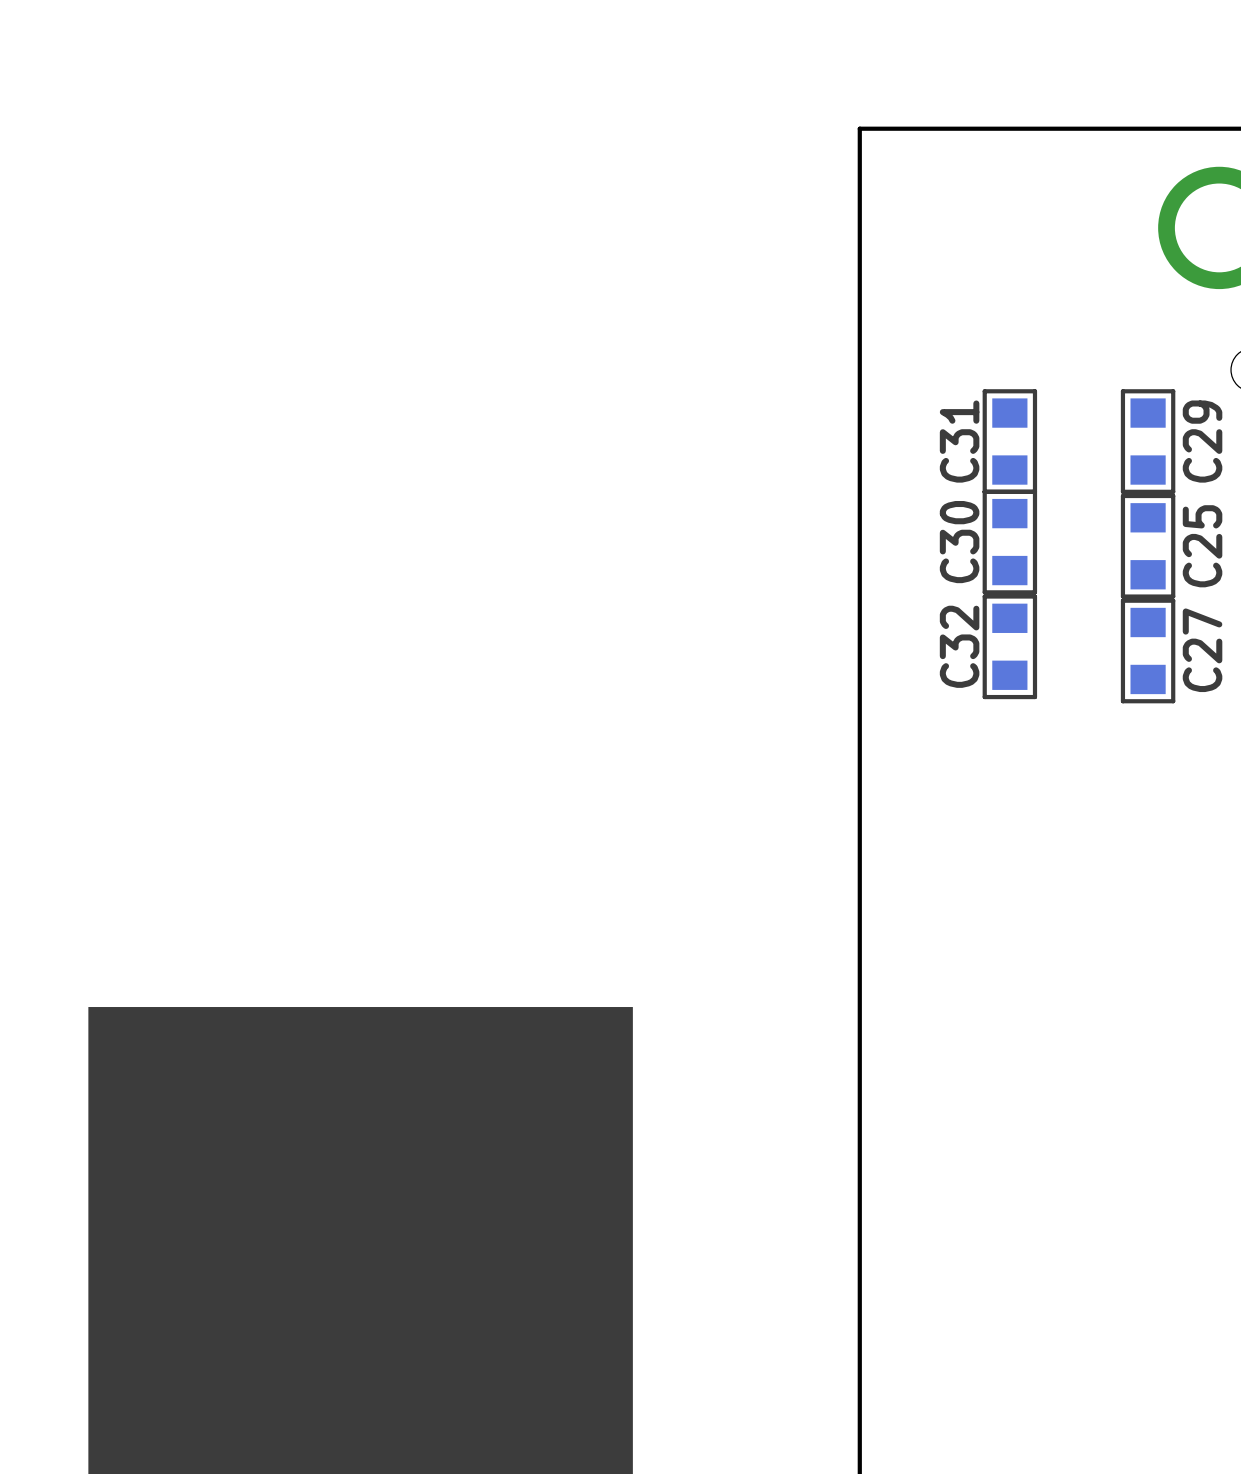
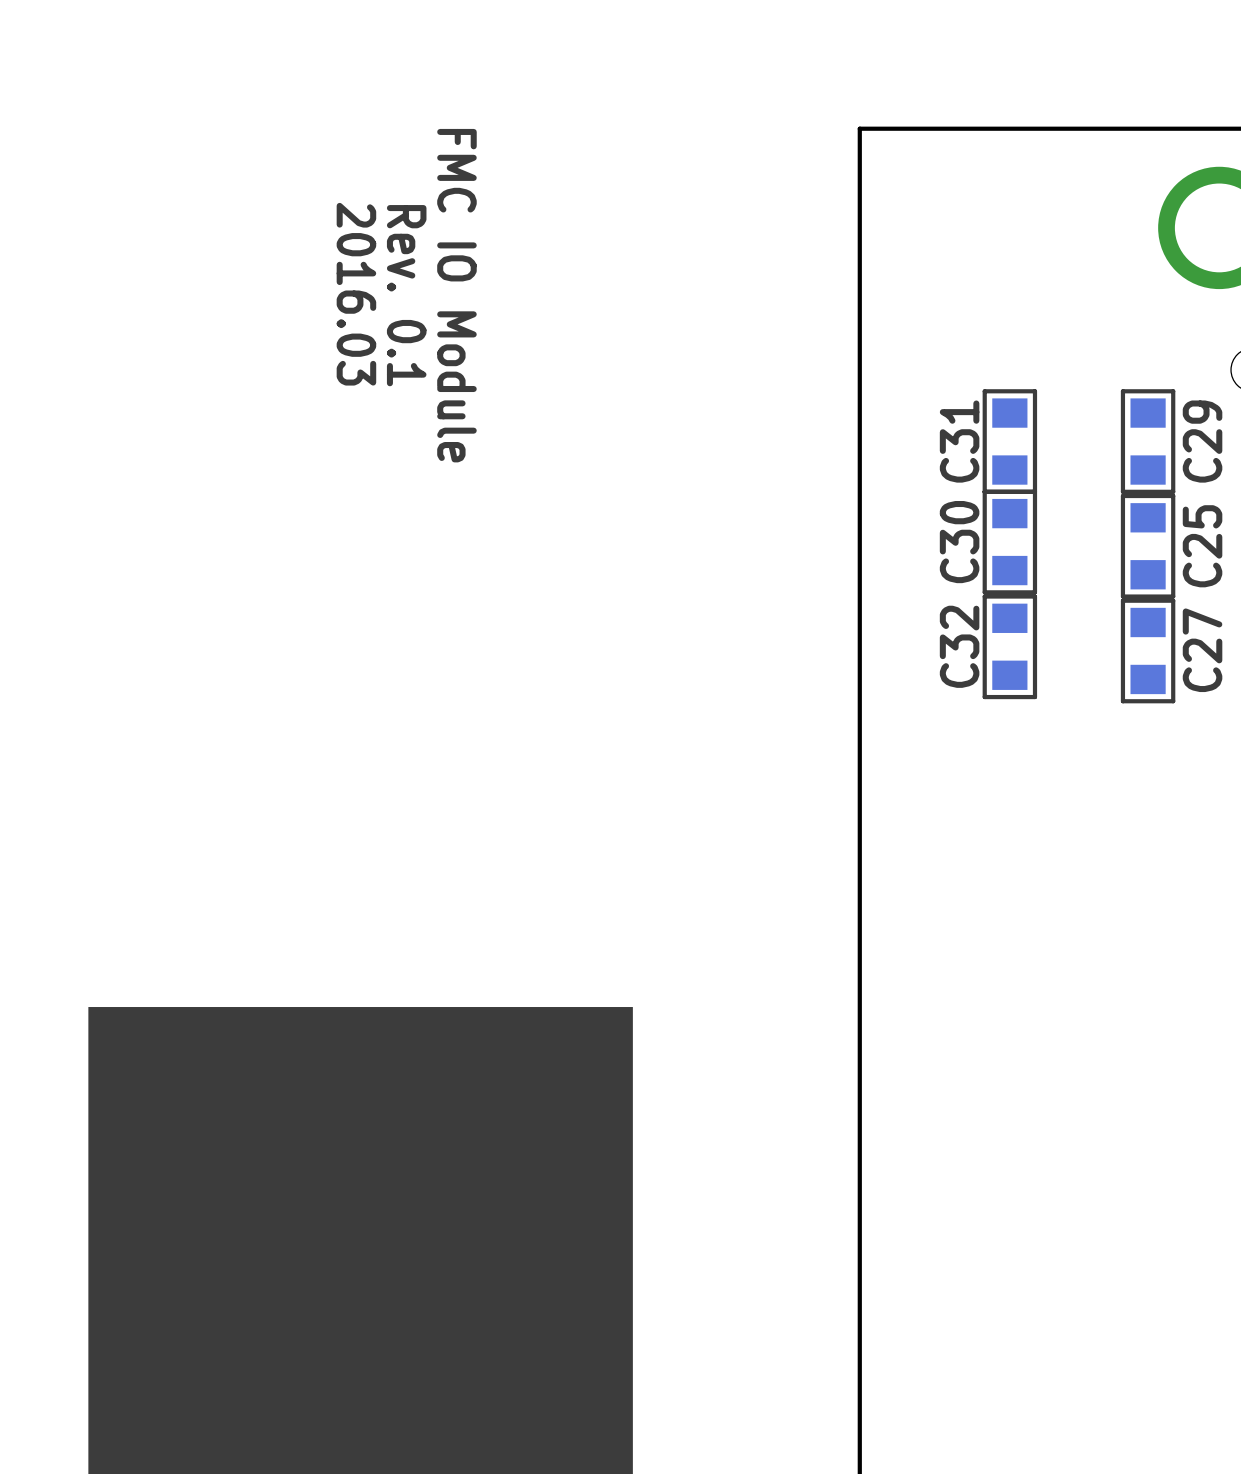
text: none -> 2016.03 (356, 294)
text: none -> Rev. 0.1 (406, 295)
text: none -> FMC IO Module (456, 295)

